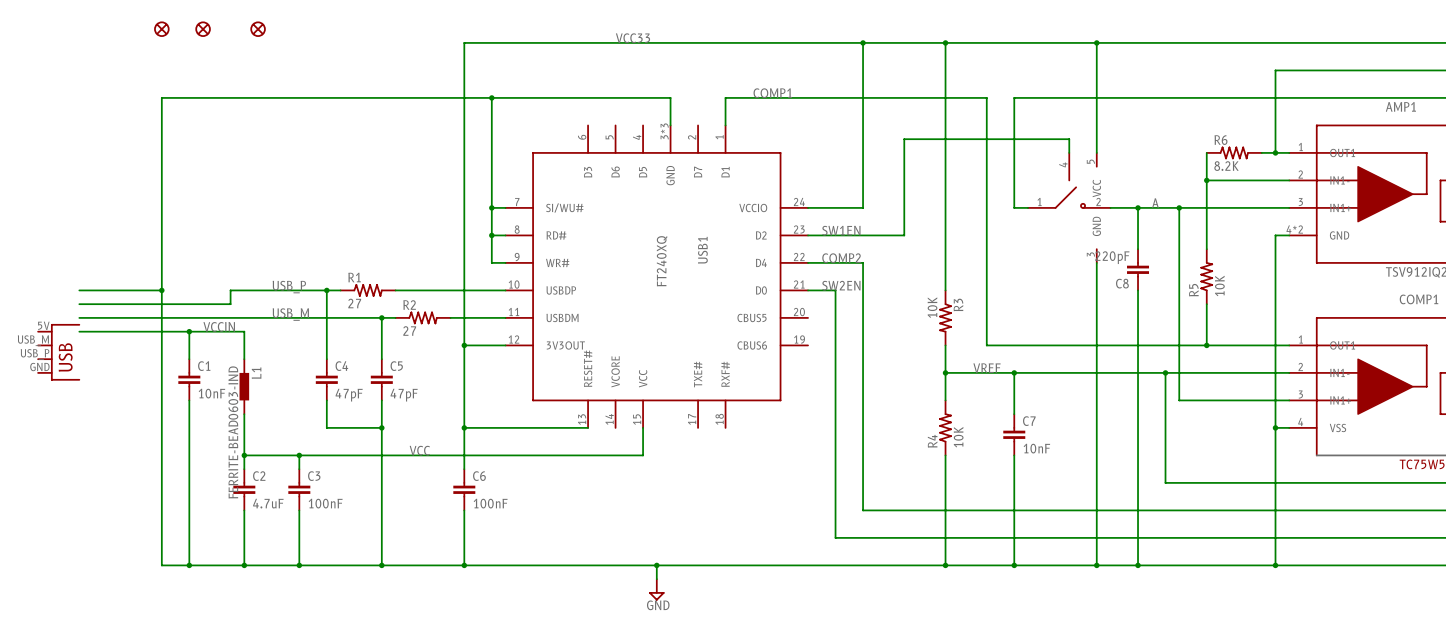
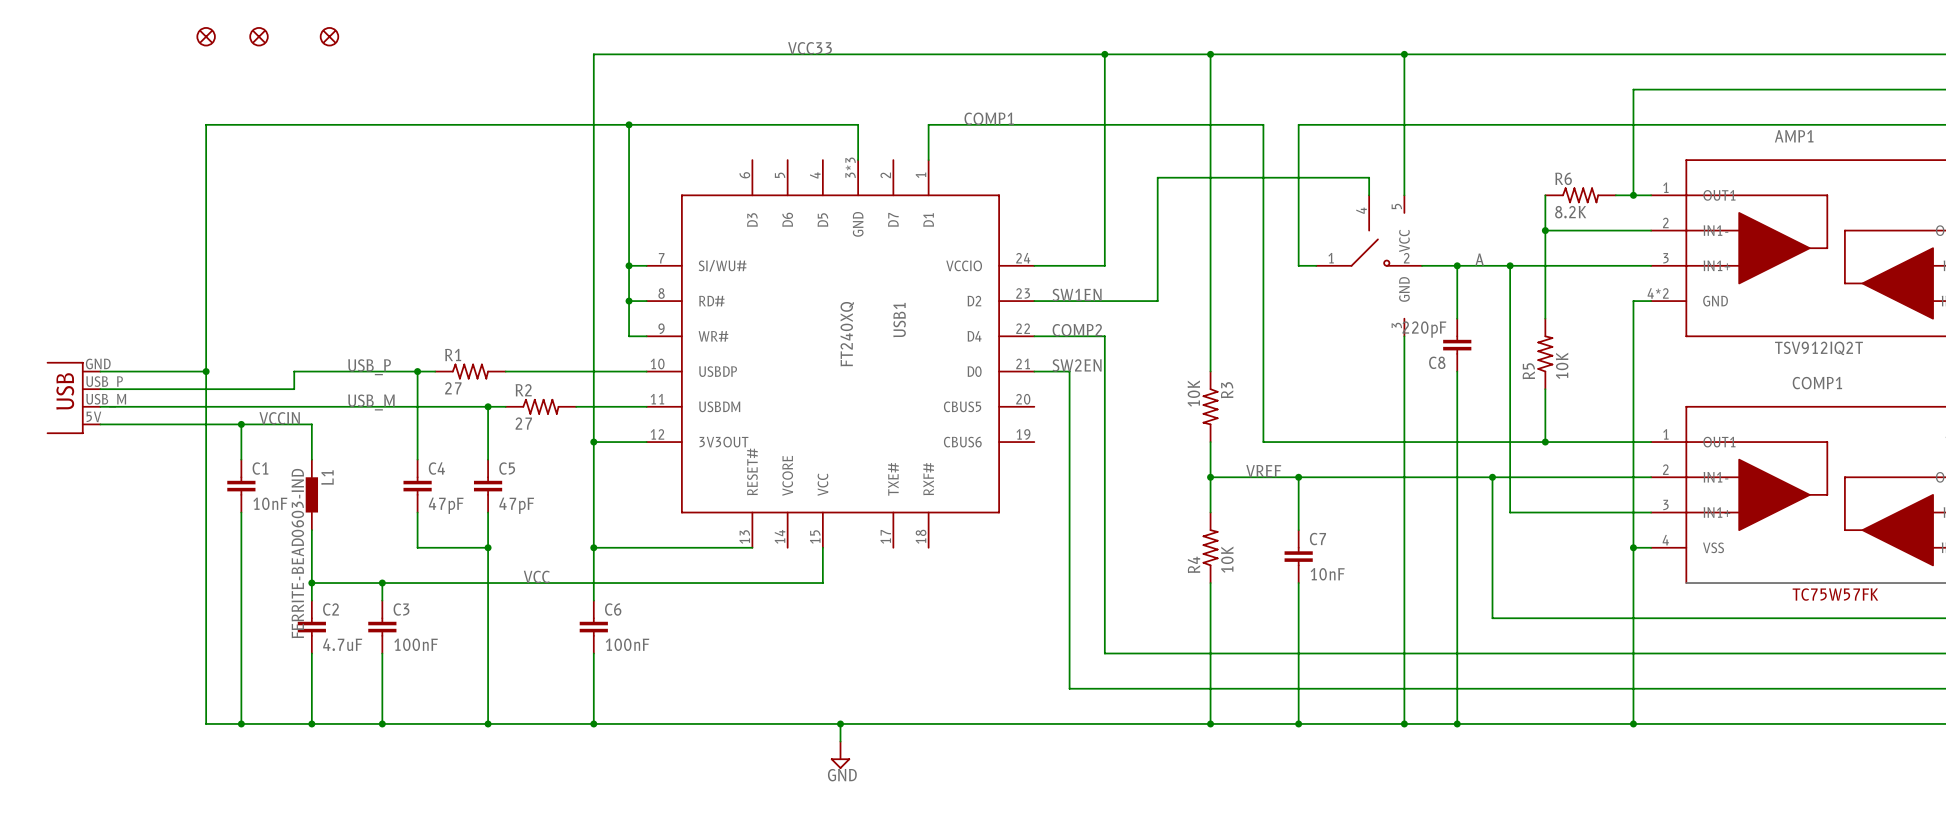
part: none -> (73, 397)
part: (59, 352) -> none

